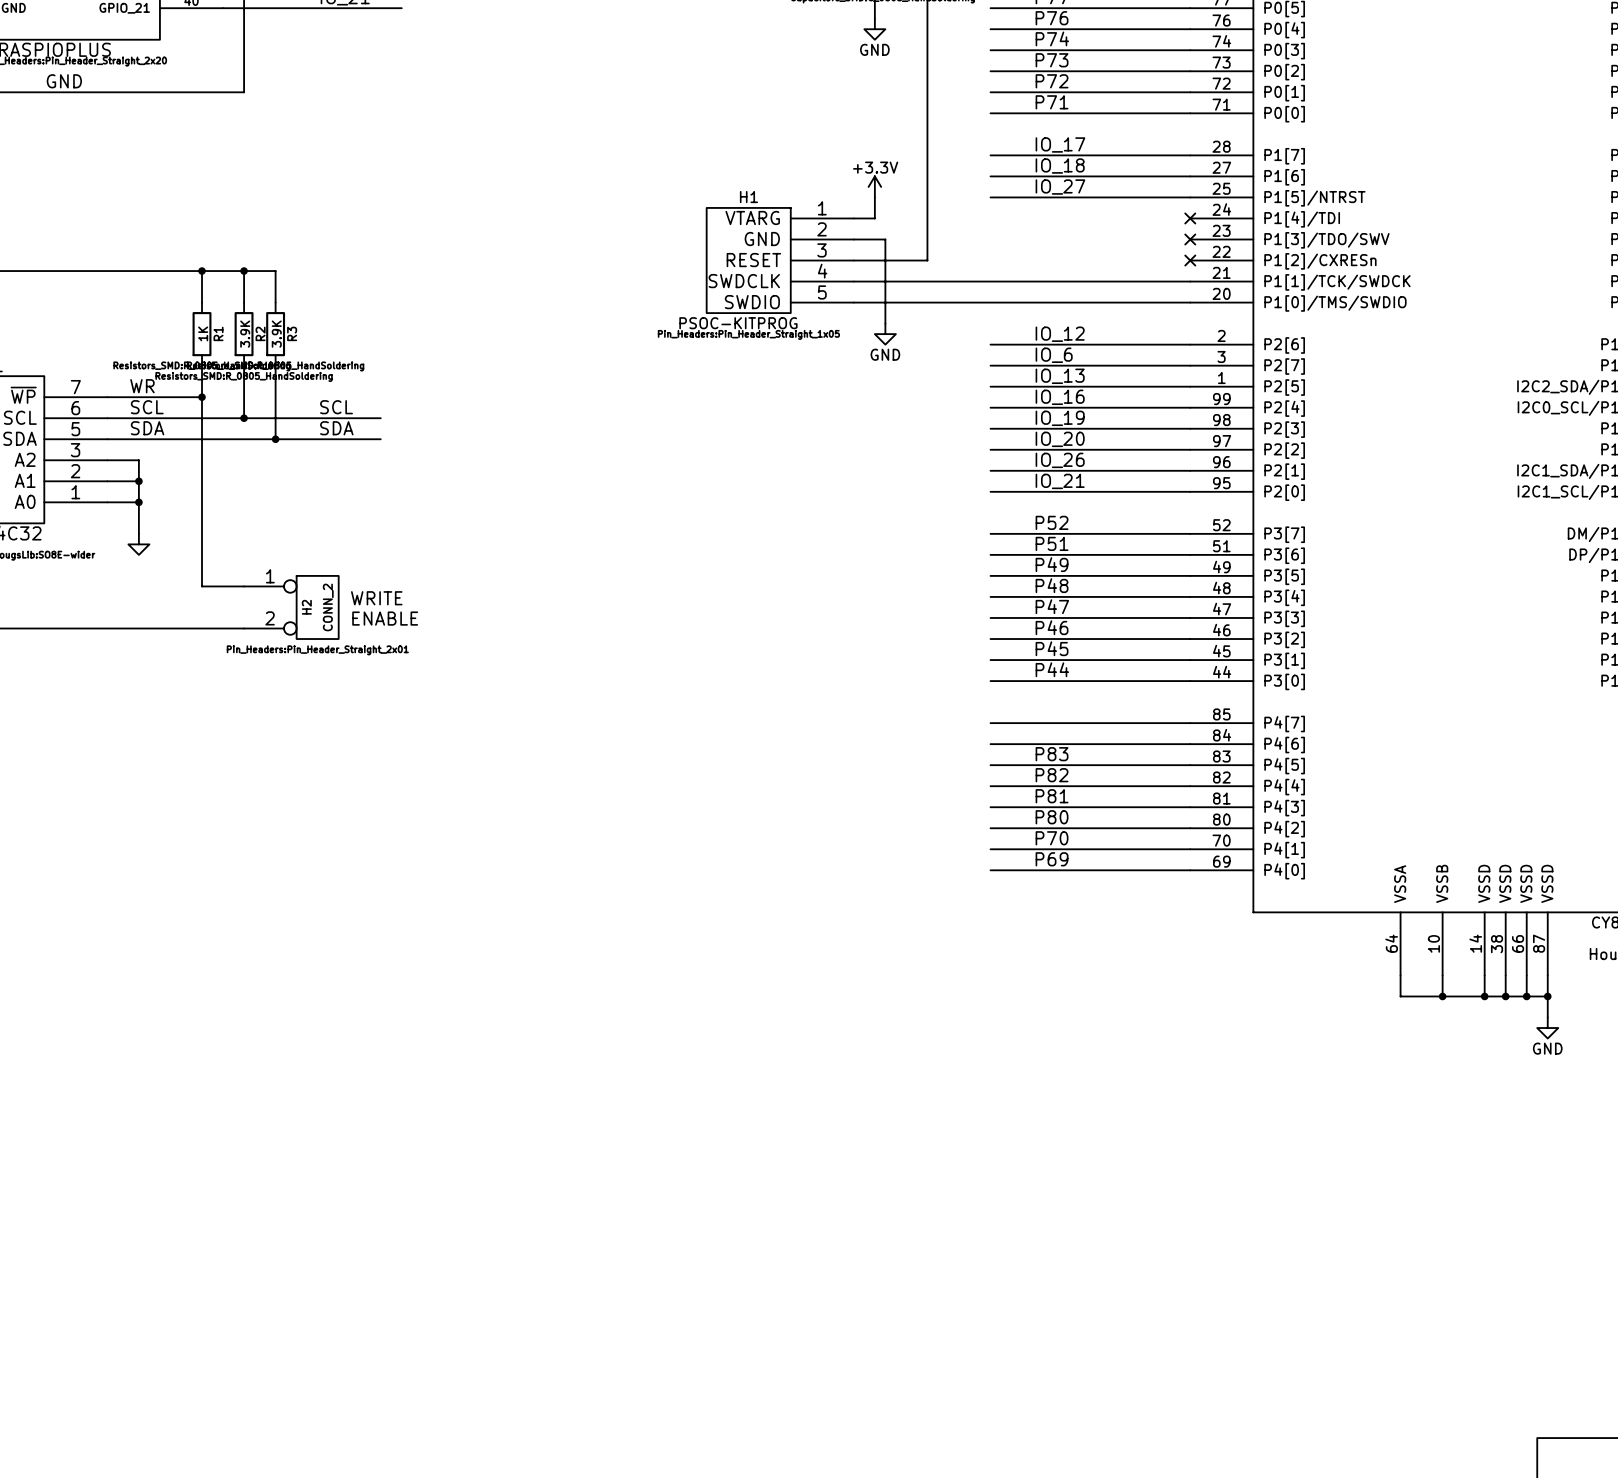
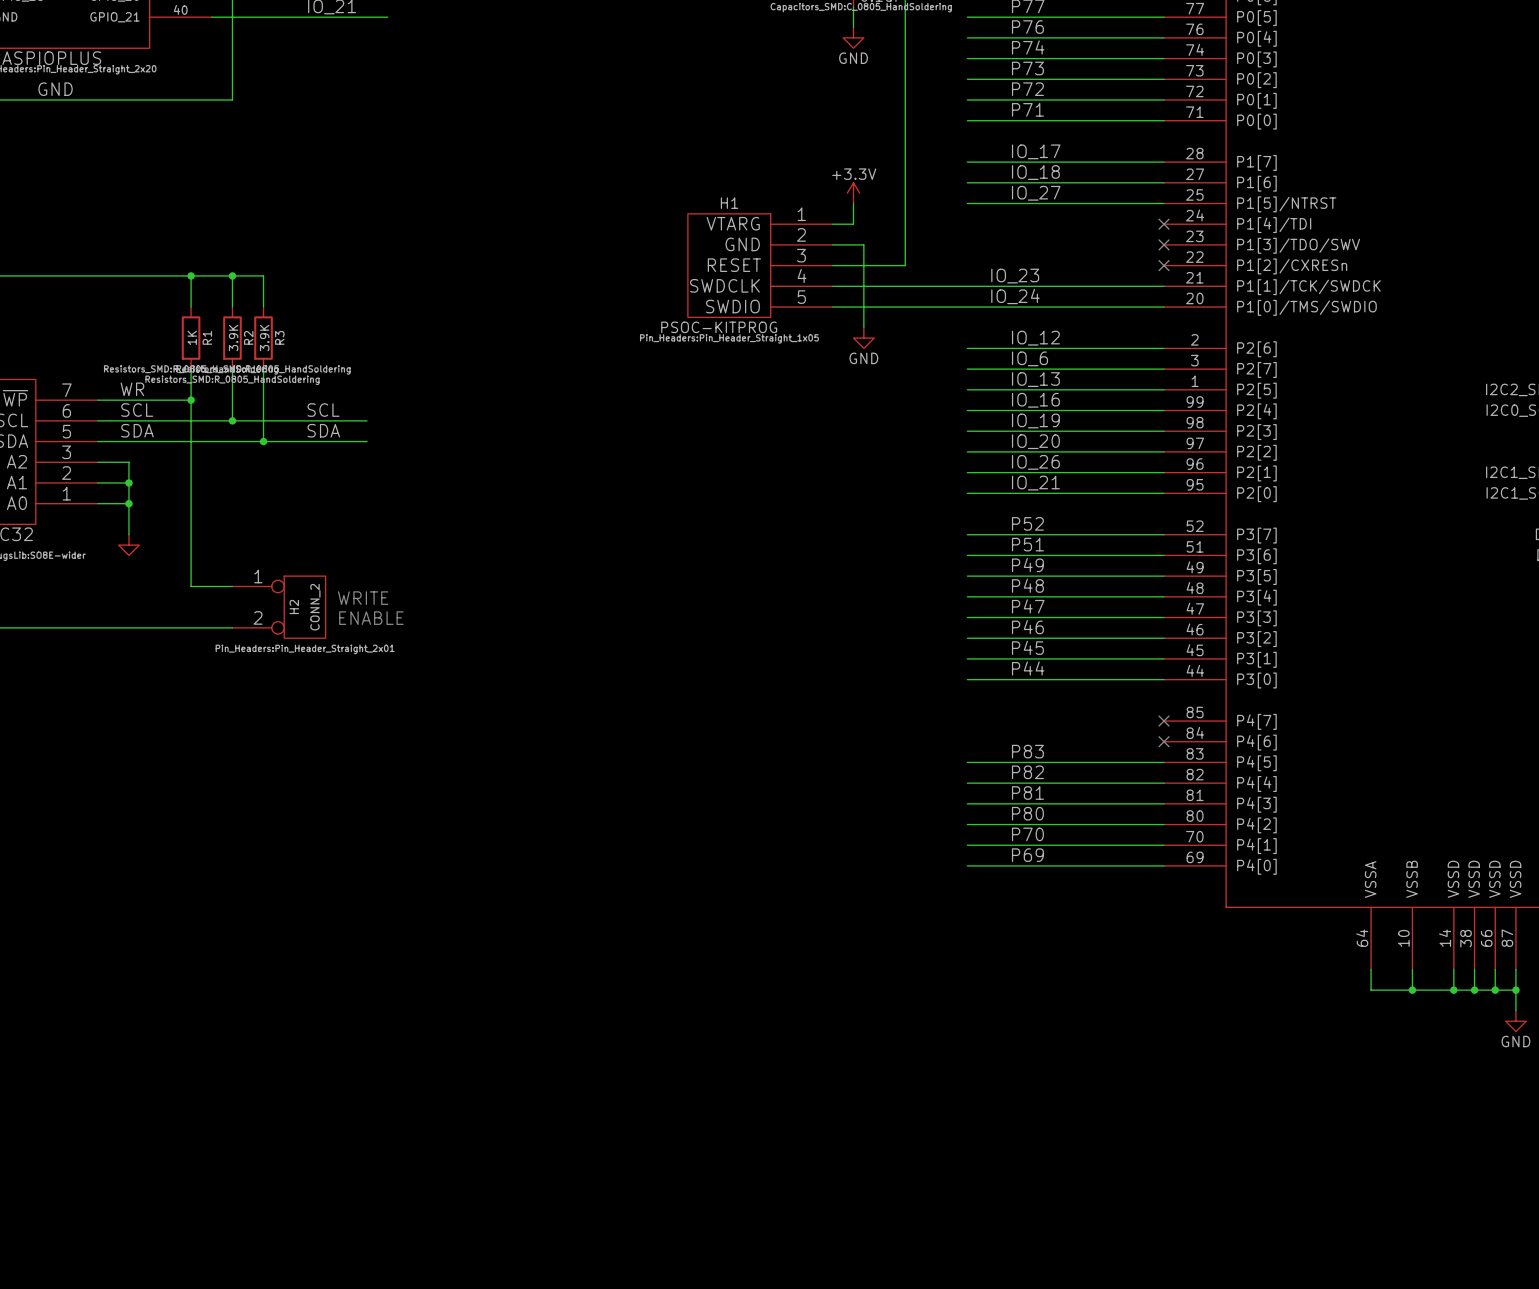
label: none -> IO_23 (1015, 276)
label: none -> IO_24 (1015, 296)
wire: (990, 723) (1190, 723) -> none
no-connect mark: none -> (1164, 721)
wire: (990, 744) (1190, 744) -> none
no-connect mark: none -> (1164, 741)

